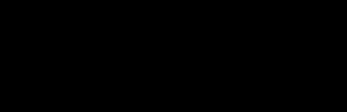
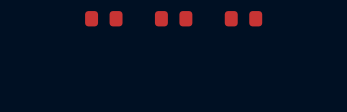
part: none -> (103, 18)
part: none -> (173, 18)
part: none -> (243, 18)

